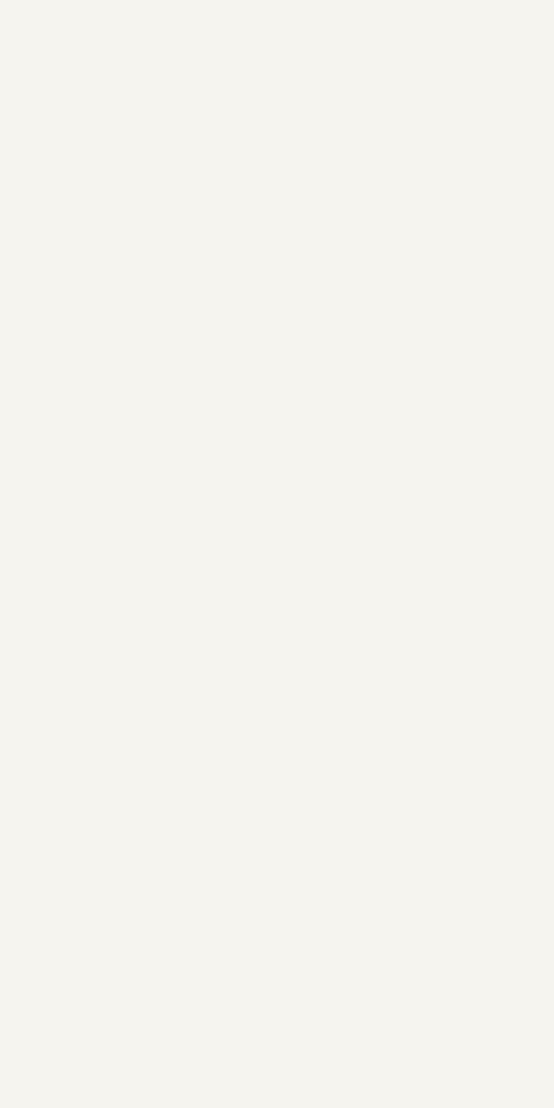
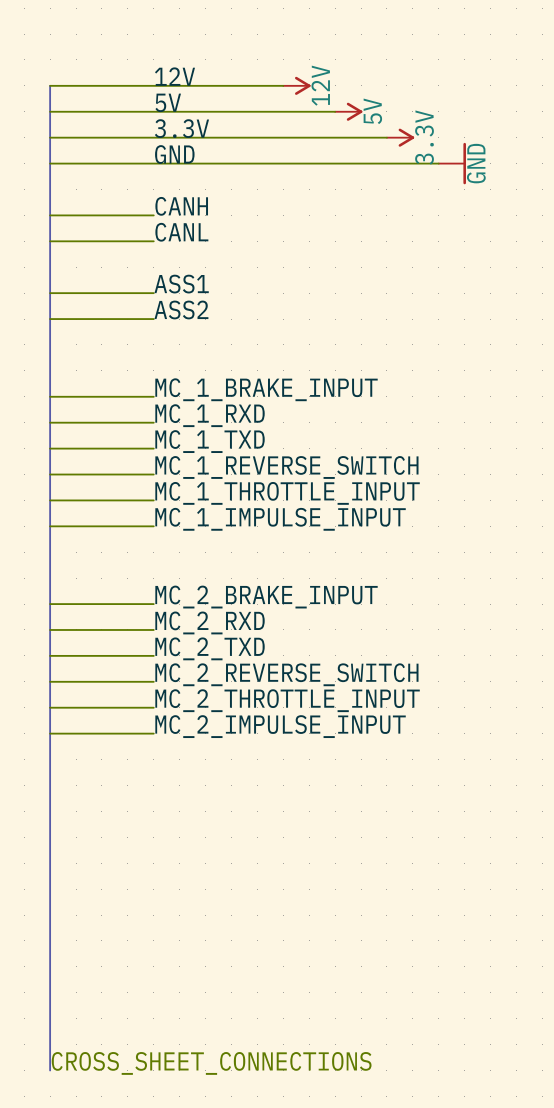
label: none -> 12V (175, 76)
bus: none -> (50, 85) (50, 1070)
wire: none -> (50, 85) (283, 85)
power symbol: none -> 12V (296, 85)
label: none -> 5V (168, 102)
wire: none -> (50, 111) (335, 111)
power symbol: none -> 5V (348, 111)
label: none -> 3.3V (181, 128)
wire: none -> (50, 137) (386, 137)
power symbol: none -> 3.3V (400, 137)
label: none -> GND (174, 154)
wire: none -> (50, 163) (438, 163)
power symbol: none -> GND (452, 163)
label: none -> CANH (181, 206)
wire: none -> (50, 215) (153, 215)
label: none -> CANL (181, 232)
wire: none -> (50, 241) (153, 241)
label: none -> ASS1 (181, 284)
wire: none -> (50, 293) (153, 293)
label: none -> ASS2 (181, 309)
wire: none -> (50, 319) (153, 319)
label: none -> MC_1_BRAKE_INPUT (266, 389)
wire: none -> (50, 396) (153, 396)
label: none -> MC_1_RXD (210, 415)
wire: none -> (50, 422) (153, 422)
label: none -> MC_1_TXD (210, 441)
wire: none -> (50, 448) (153, 448)
label: none -> MC_1_REVERSE_SWITCH (286, 467)
wire: none -> (50, 474) (153, 474)
label: none -> MC_1_THROTTLE_INPUT (287, 493)
wire: none -> (50, 500) (153, 500)
label: none -> MC_1_IMPULSE_INPUT (280, 519)
wire: none -> (50, 526) (153, 526)
label: none -> MC_2_BRAKE_INPUT (266, 597)
wire: none -> (50, 604) (153, 604)
label: none -> MC_2_RXD (210, 622)
wire: none -> (50, 629) (153, 629)
label: none -> MC_2_TXD (210, 648)
wire: none -> (50, 655) (153, 655)
label: none -> MC_2_REVERSE_SWITCH (286, 674)
wire: none -> (50, 681) (153, 681)
label: none -> MC_2_THROTTLE_INPUT (287, 700)
wire: none -> (50, 707) (153, 707)
label: none -> MC_2_IMPULSE_INPUT (280, 726)
wire: none -> (50, 733) (153, 733)
text: none -> CROSS_SHEET_CONNECTIONS (211, 1063)

